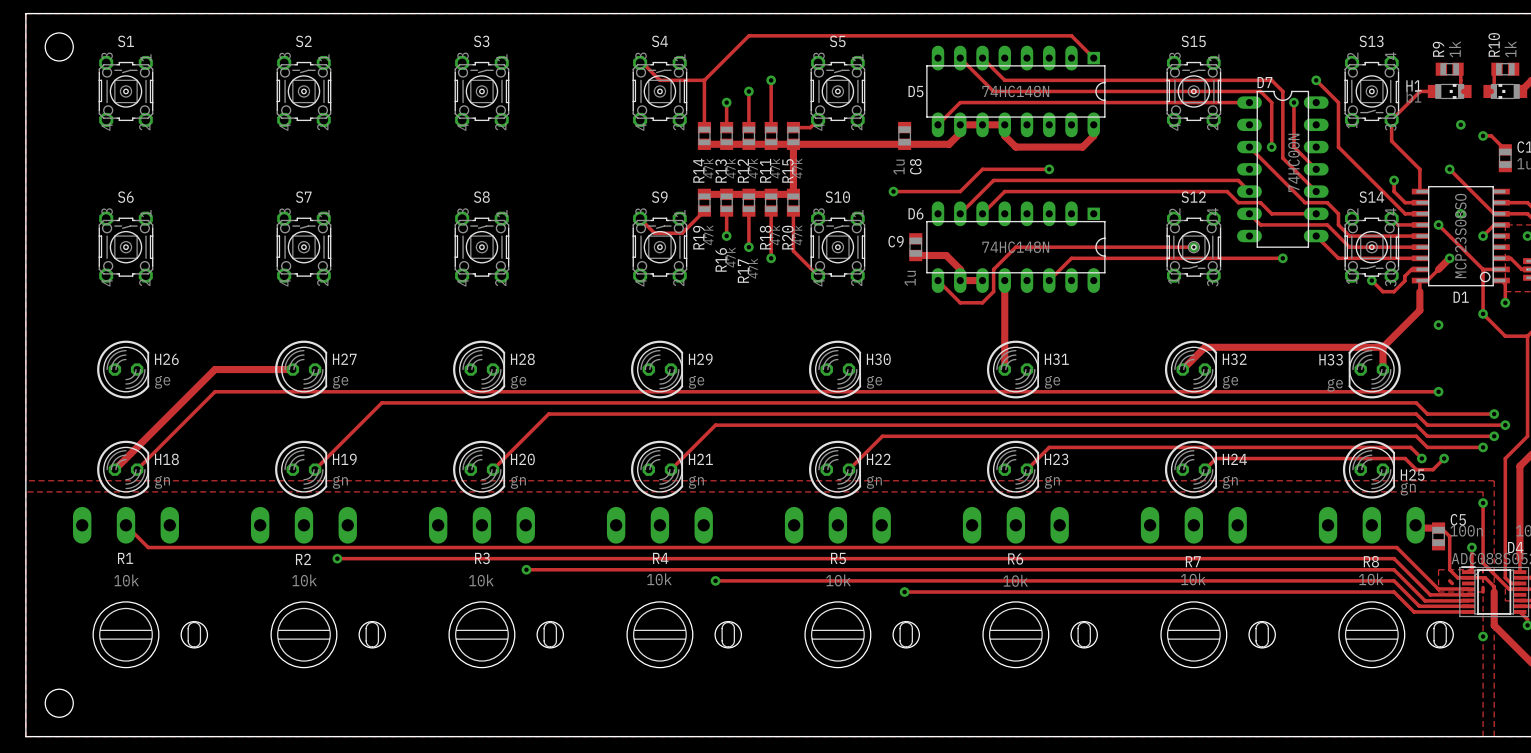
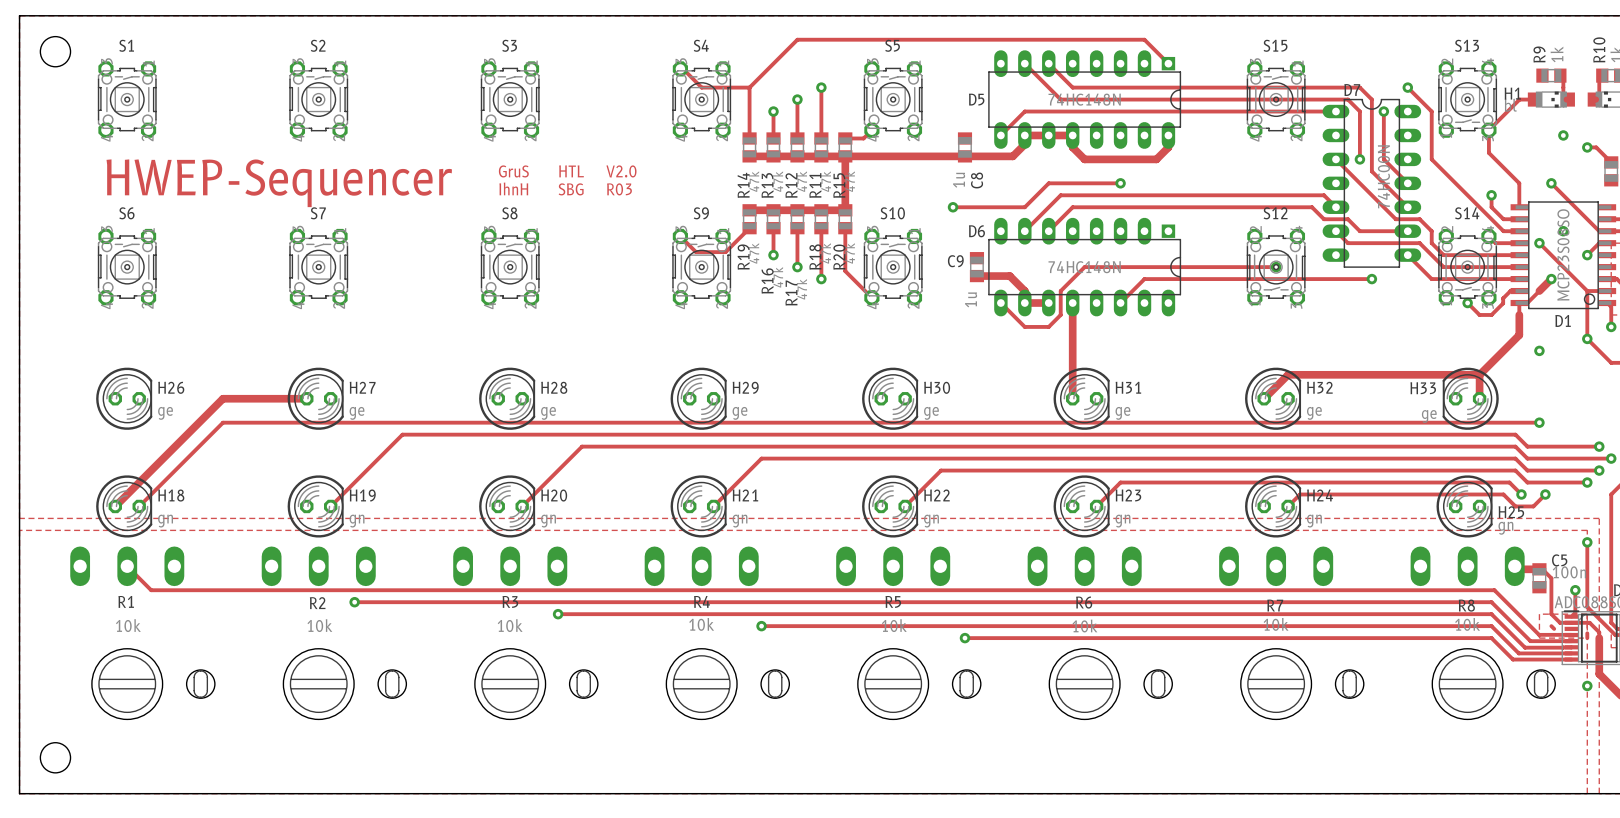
text: none -> GruS (513, 171)
text: none -> HTL (571, 171)
text: none -> V2.0 (621, 171)
text: none -> HWEP-Sequencer (279, 183)
text: none -> IhnH (513, 188)
text: none -> SBG (571, 189)
text: none -> R03 (619, 189)

